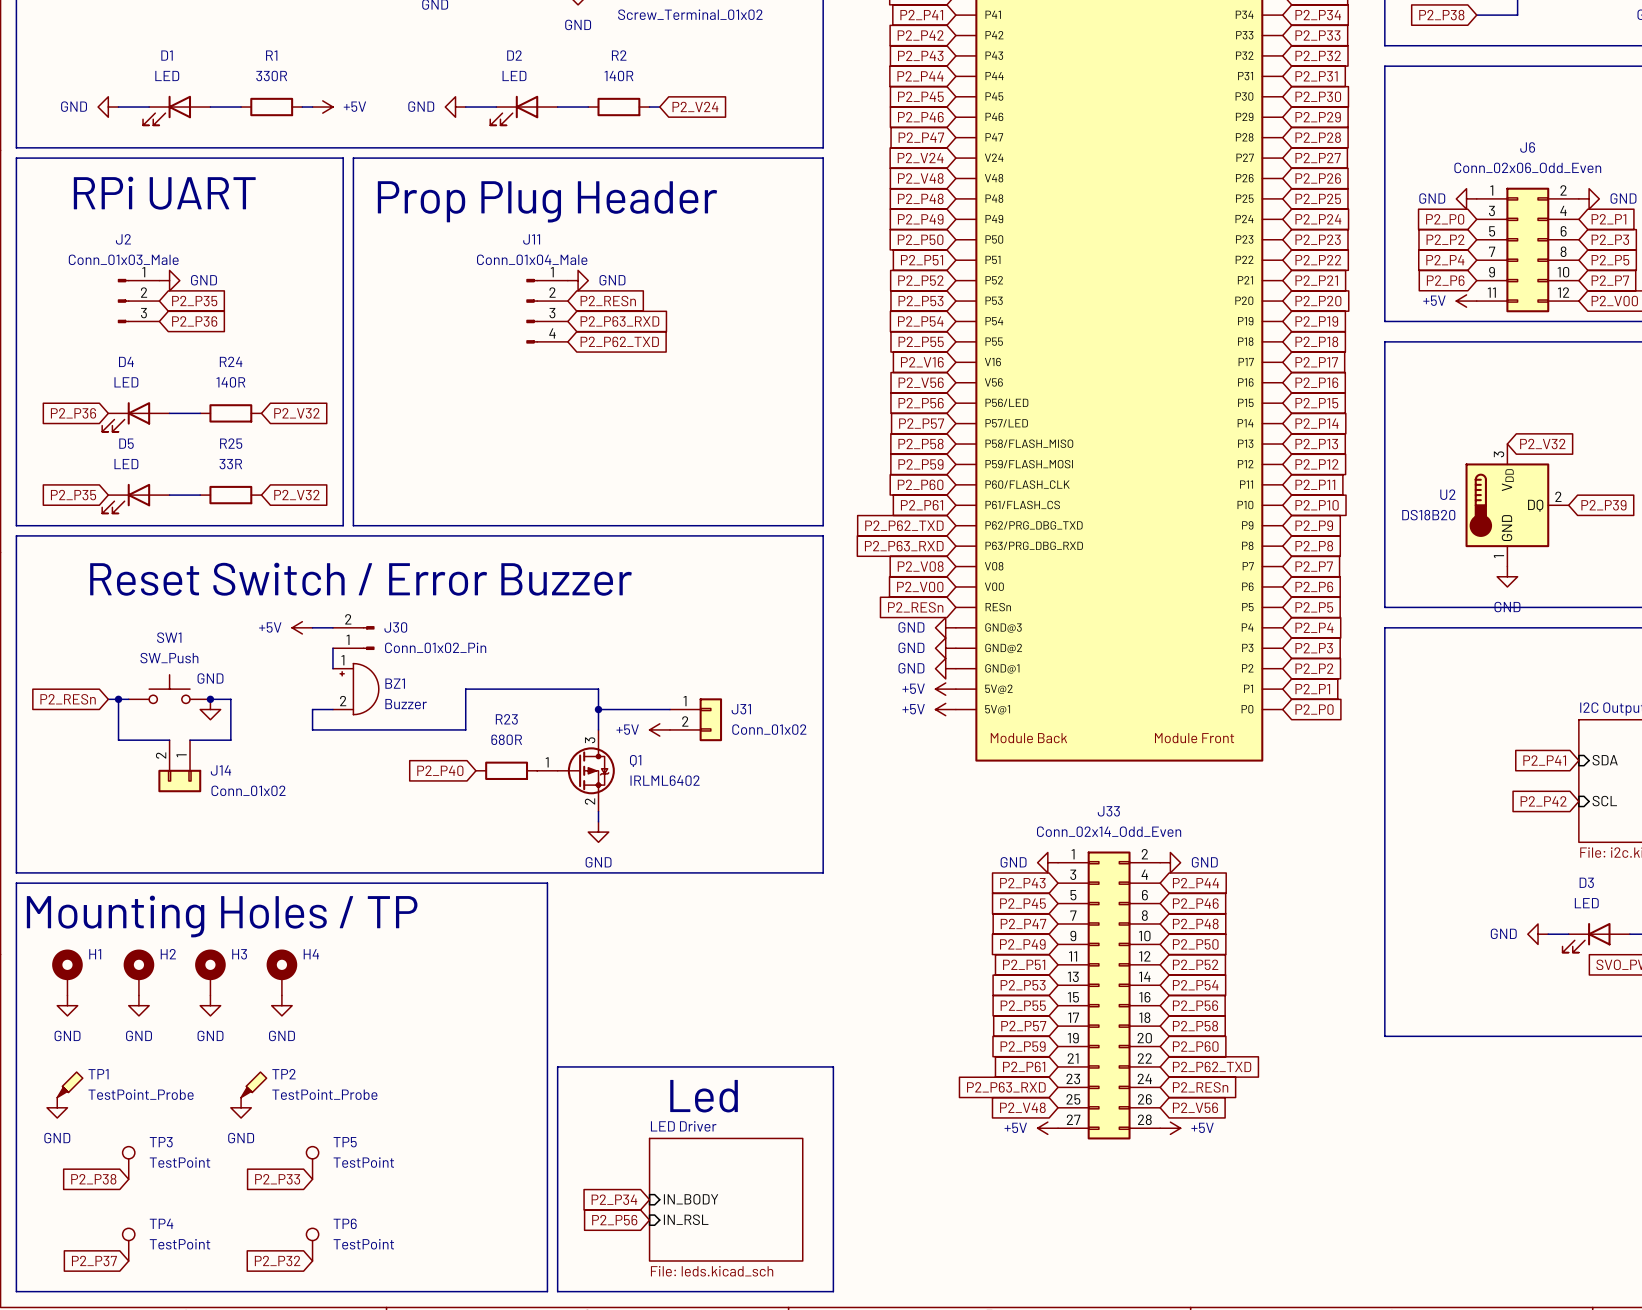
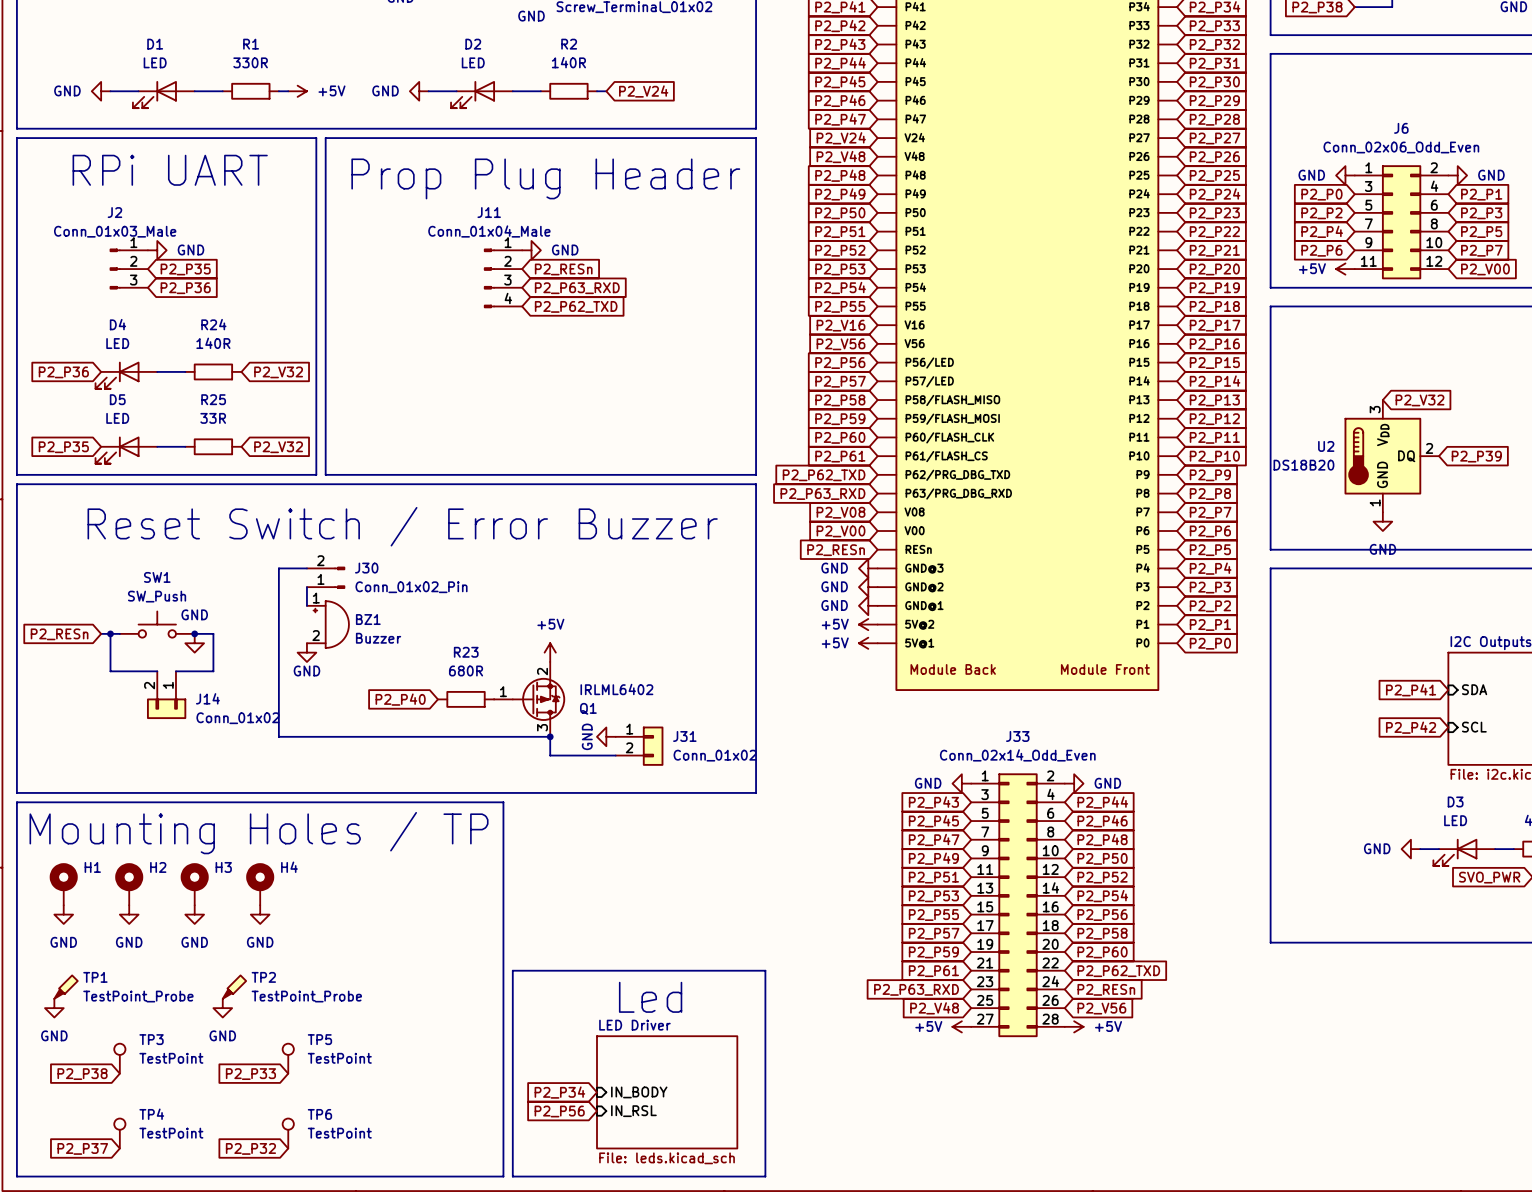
power symbol: +5V (302, 627) -> none
wire: none -> (288, 568) (278, 568) (278, 736) (550, 736)
wire: (332, 709) (312, 709) (312, 729) (465, 729) (465, 689) (598, 689) (598, 729) -> none
wire: (598, 709) (669, 709) -> none
junction: (598, 709) -> none
power symbol: none -> GND (306, 652)
J31 position: (696, 719) -> (639, 746)
power symbol rotation: 0° (659, 729) -> 90° clockwise (550, 652)
power symbol position: +5V (659, 729) -> +5V (550, 652)
Q1 flip: as is (586, 770) -> up-down (538, 699)
junction: none -> (550, 736)
wire: none -> (550, 746) (550, 755) (615, 755)
power symbol rotation: 0° (598, 832) -> 90° clockwise (606, 736)
power symbol position: GND (598, 832) -> GND (606, 736)

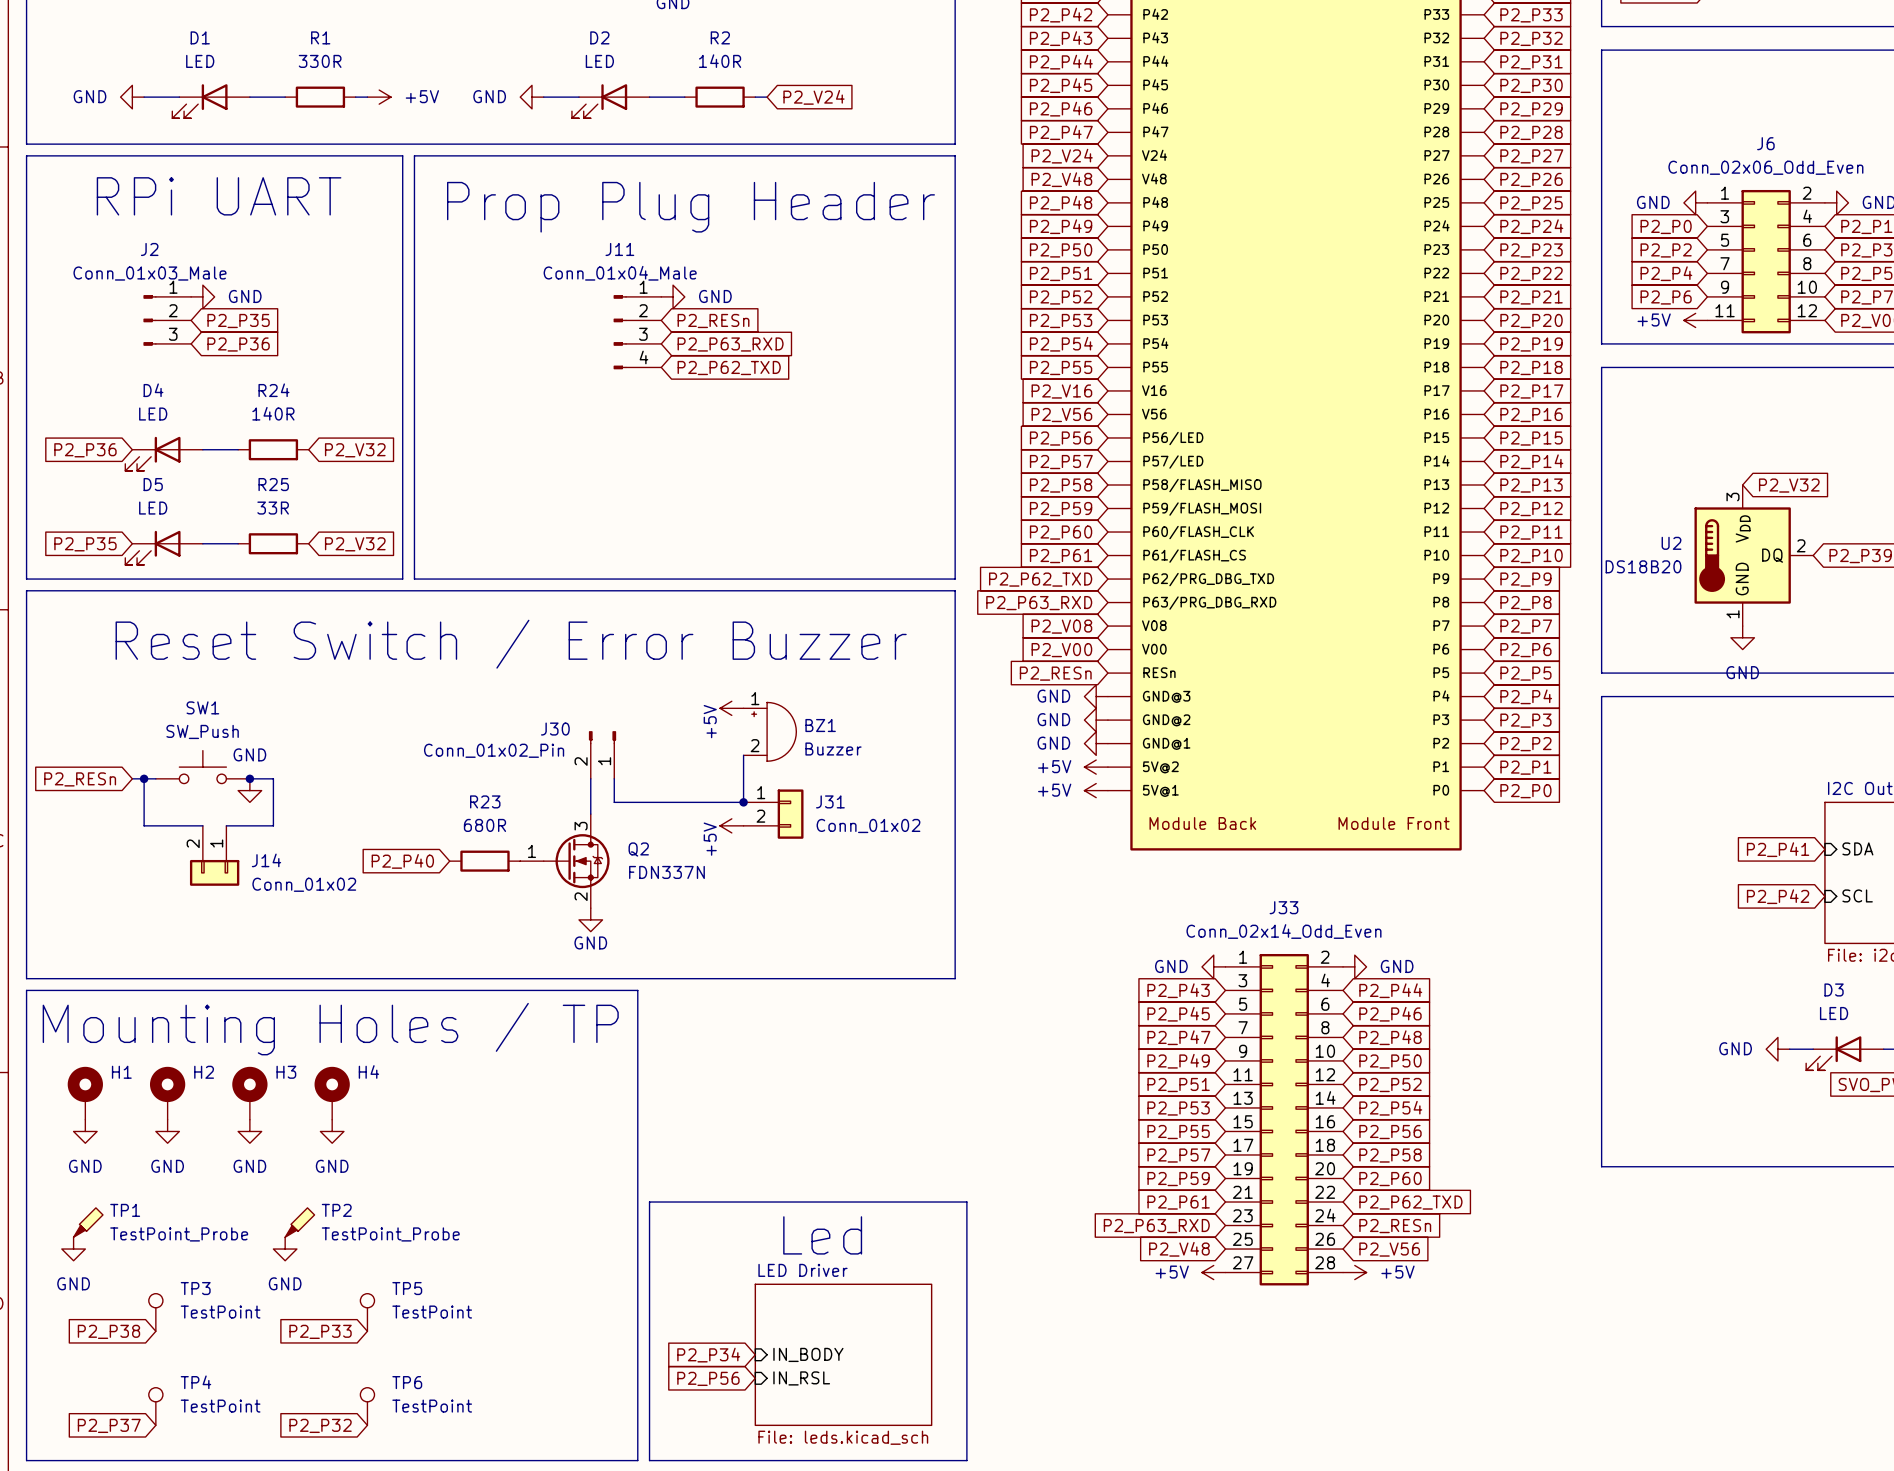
wire: (306, 568) (278, 568) (278, 736) (550, 736) (550, 755) (615, 755) -> none
J30 name position: J30 (366, 568) -> J30 (555, 729)
J30 position: (325, 577) -> (602, 754)
J30 rotation: 0° (339, 577) -> 90° counterclockwise (602, 737)
power symbol: none -> +5V (731, 708)
wire: (306, 587) (306, 605) -> none
J30 value position: Conn_01x02_Pin (411, 587) -> Conn_01x02_Pin (494, 750)
wire: none -> (743, 755) (743, 802) (614, 802) (614, 778)
BZ1 position: (327, 624) -> (769, 731)
power symbol text position: +5V (550, 624) -> +5V (710, 839)
wire: none -> (590, 778) (590, 814)
power symbol: GND (306, 652) -> none
power symbol rotation: 0° (550, 652) -> 90° counterclockwise (731, 825)
power symbol position: +5V (550, 652) -> +5V (731, 825)
junction: none -> (743, 802)
global label position: P2_P40 (400, 699) -> P2_P40 (402, 861)
Q2: none -> FDN337N (564, 861)
R23 position: (466, 699) -> (484, 861)
Q1: IRLML6402 (529, 699) -> none
junction: (550, 736) -> none
power symbol: GND (606, 736) -> none
power symbol: none -> GND (590, 919)
J31 position: (639, 746) -> (773, 814)

